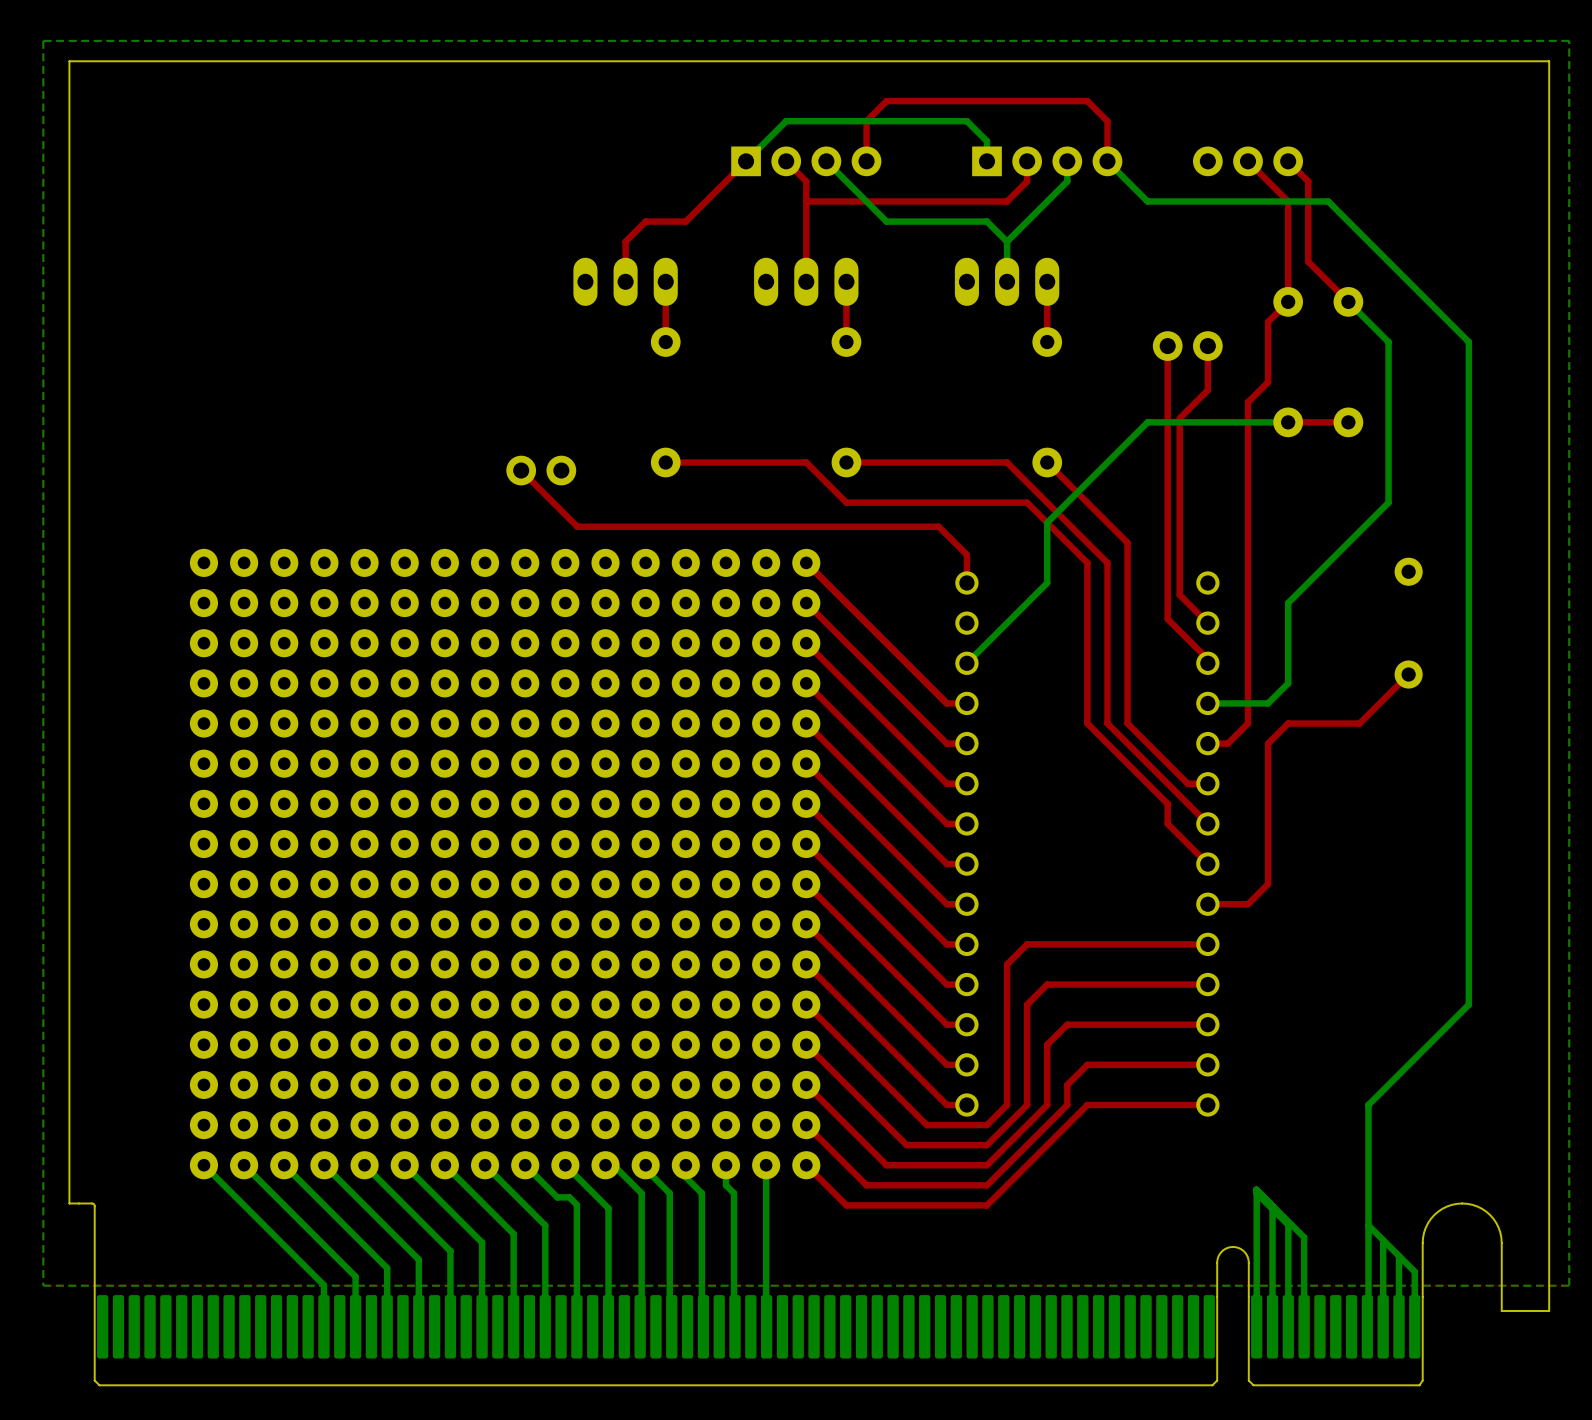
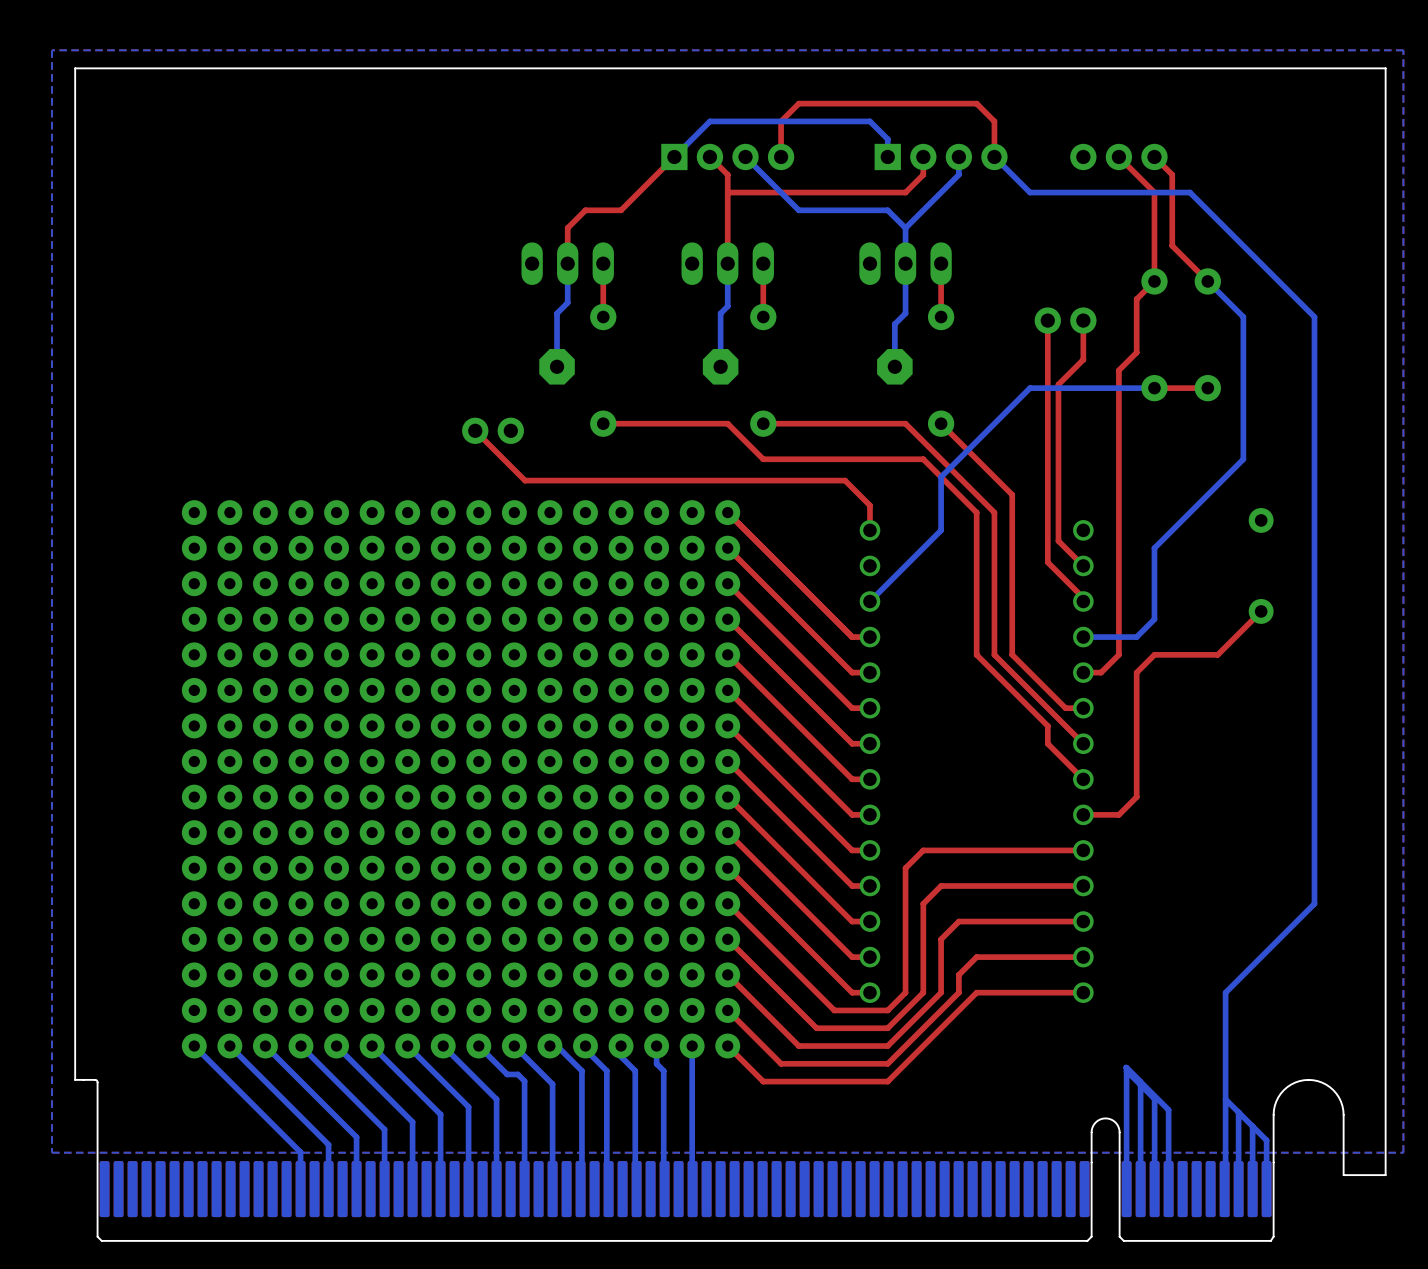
bottom track: none -> (567, 263) (567, 302) (557, 313) (557, 366)
bottom track: none -> (727, 263) (727, 306) (720, 313) (720, 366)
bottom track: none -> (905, 263) (905, 313) (894, 324) (894, 366)
part: none -> (557, 366)
part: none -> (720, 366)
part: none -> (894, 366)

